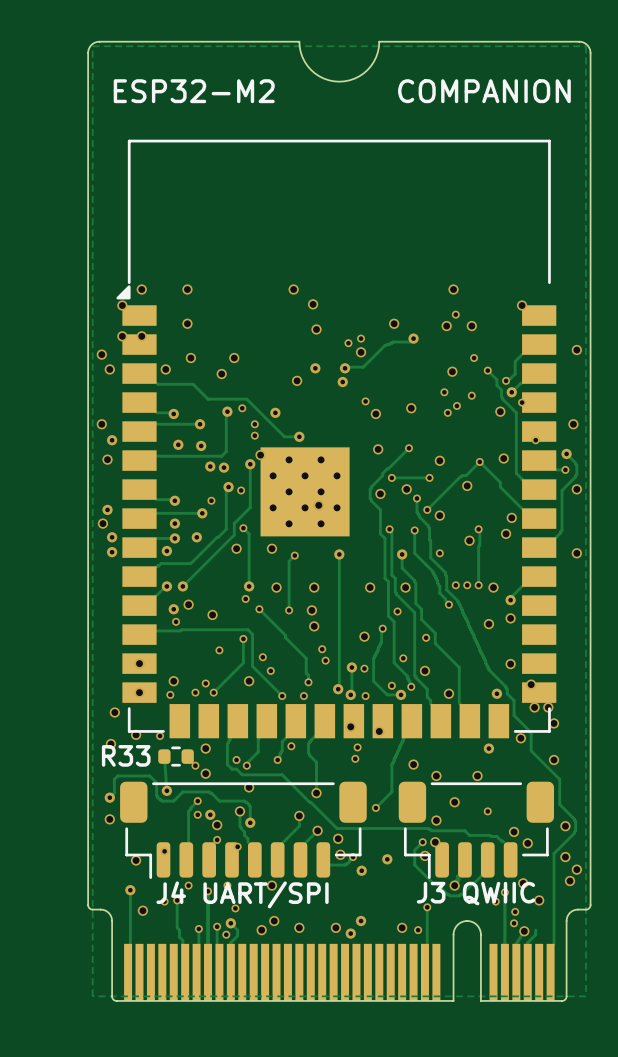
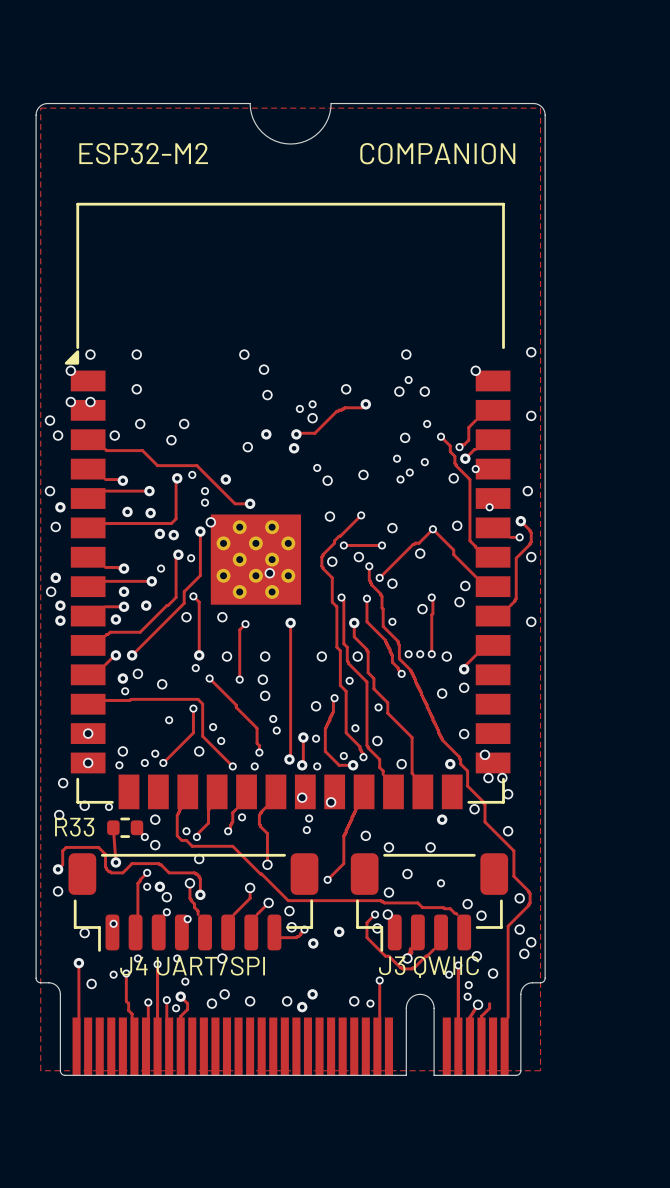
via: none -> (531, 352)

